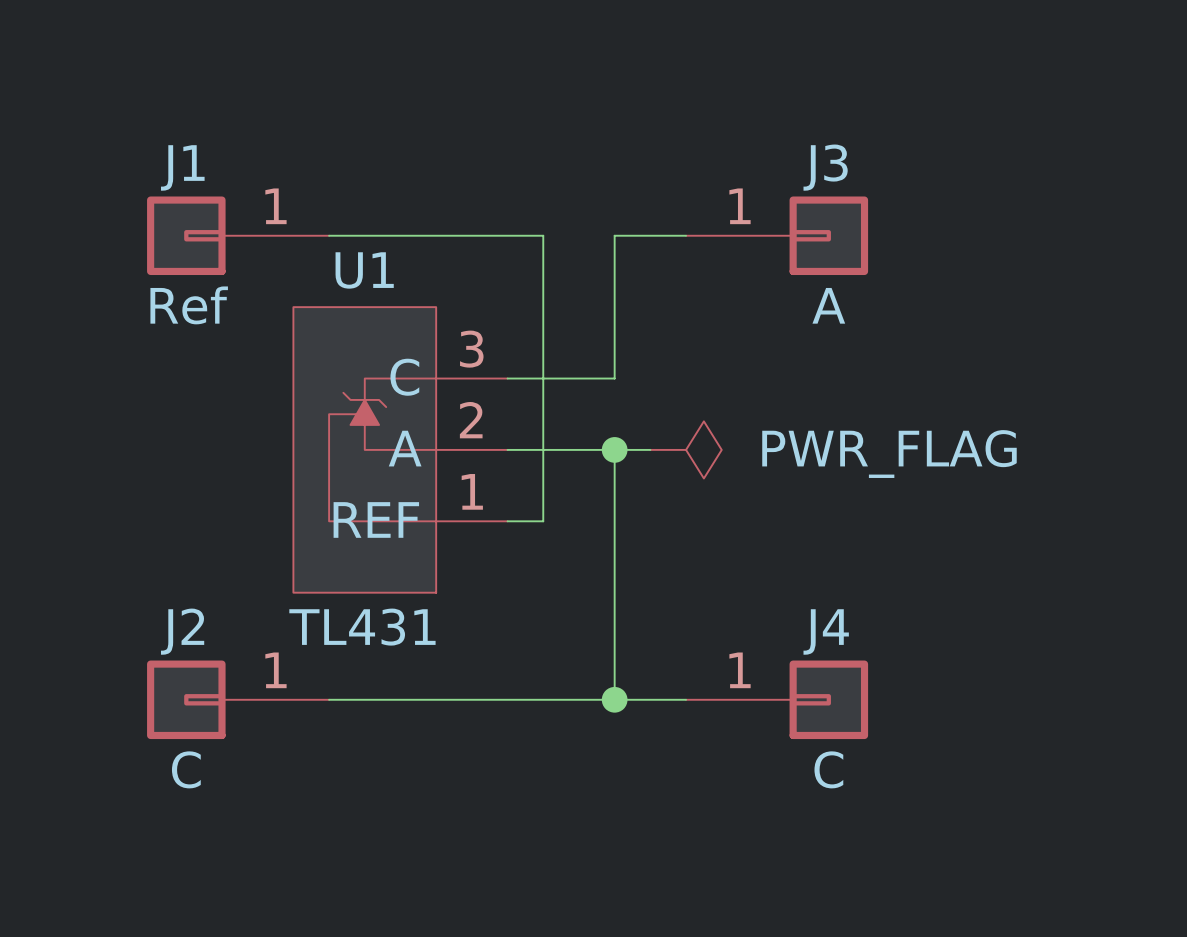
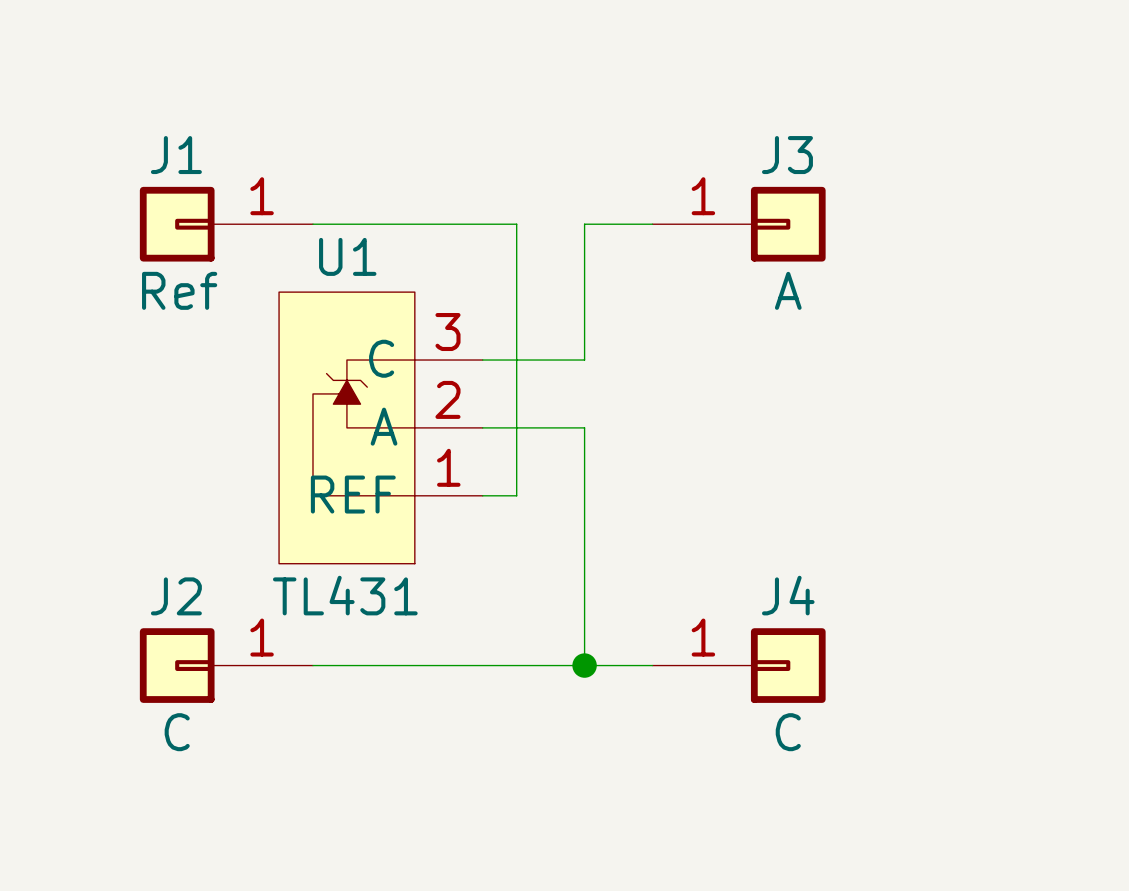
wire: (614, 449) (650, 449) -> none
junction: (614, 449) -> none
power symbol: PWR_FLAG (686, 449) -> none

